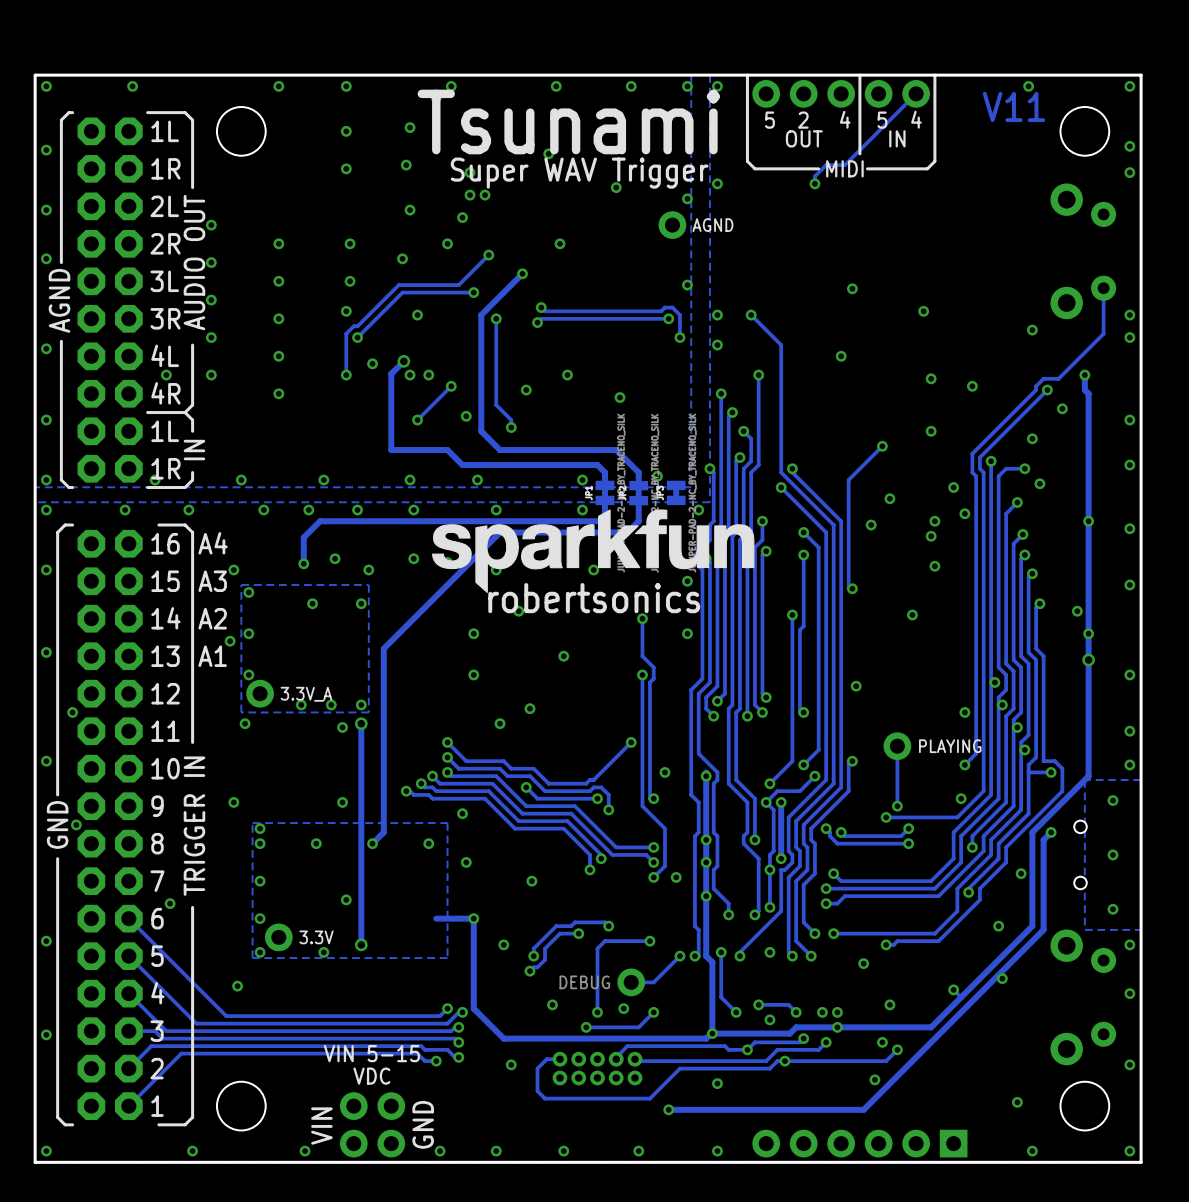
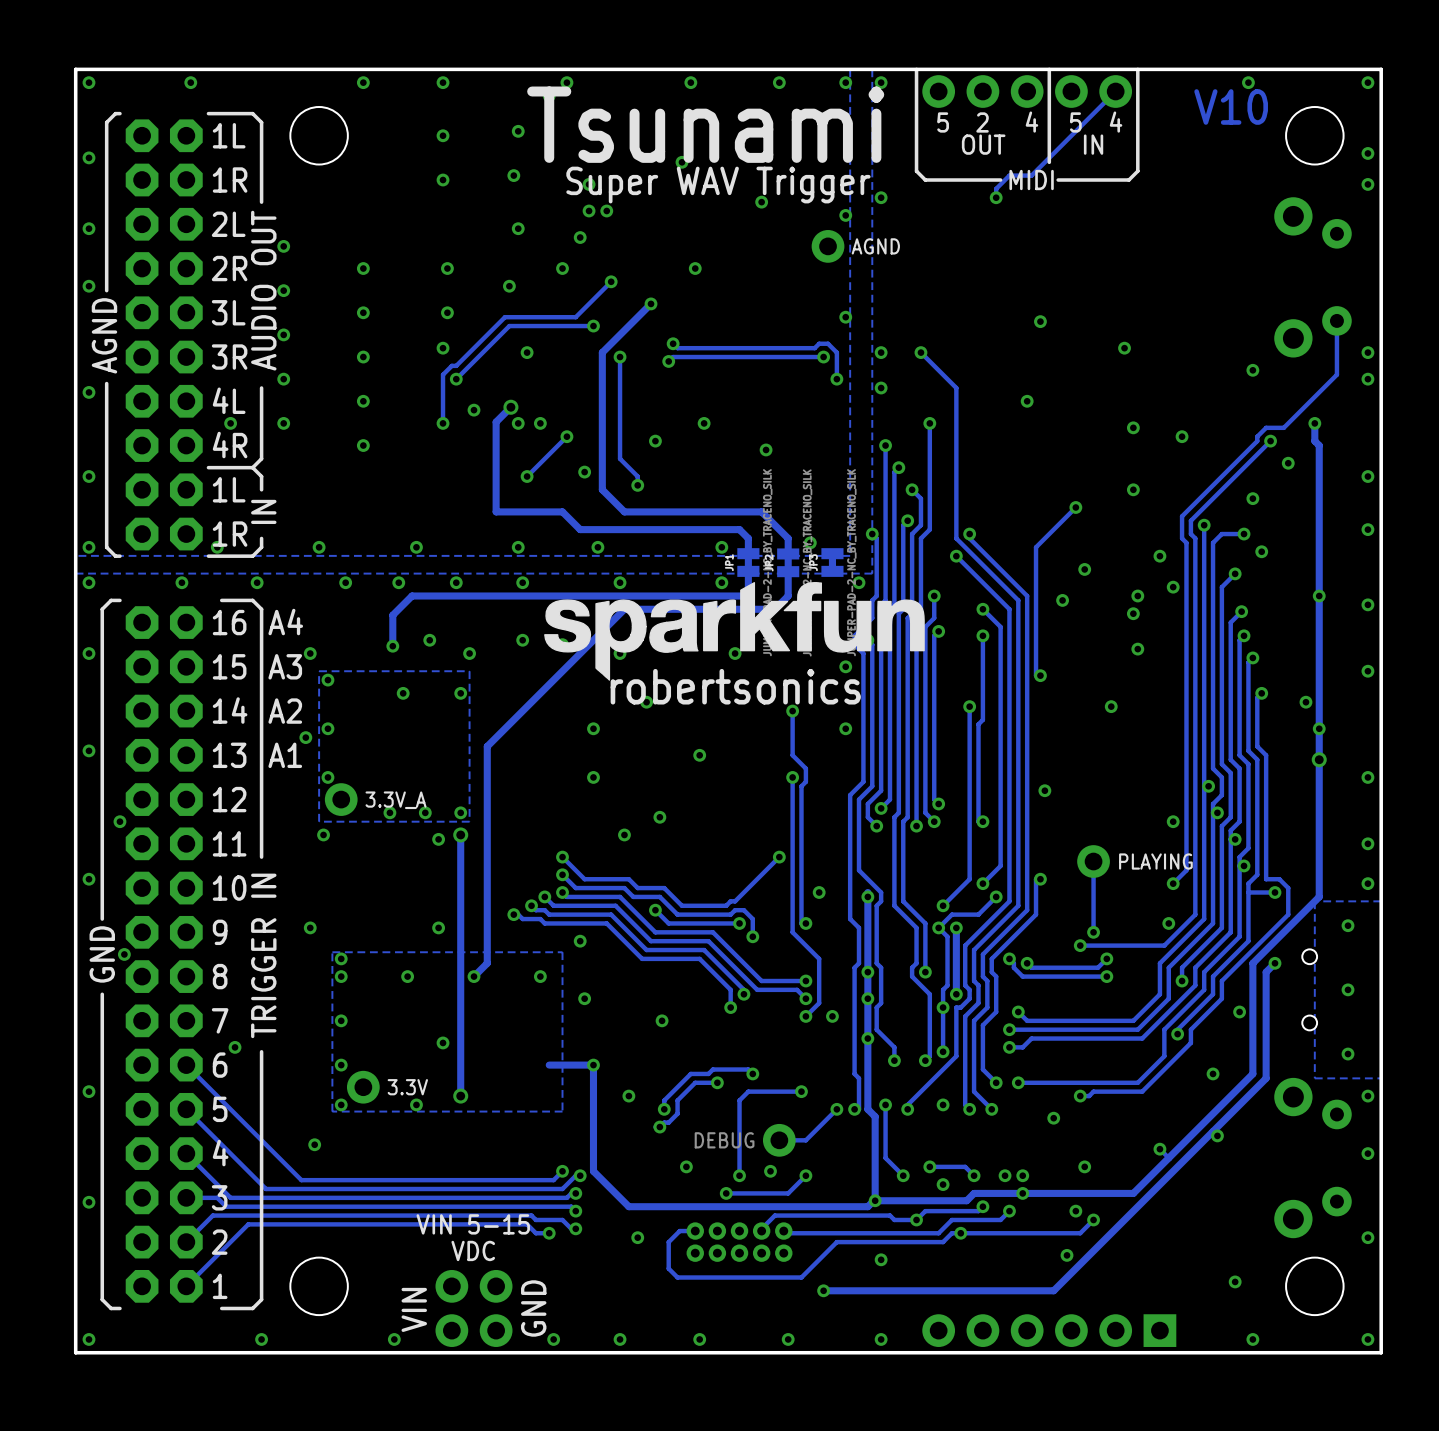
text: V11 (1013, 106) -> V10 (1231, 106)

